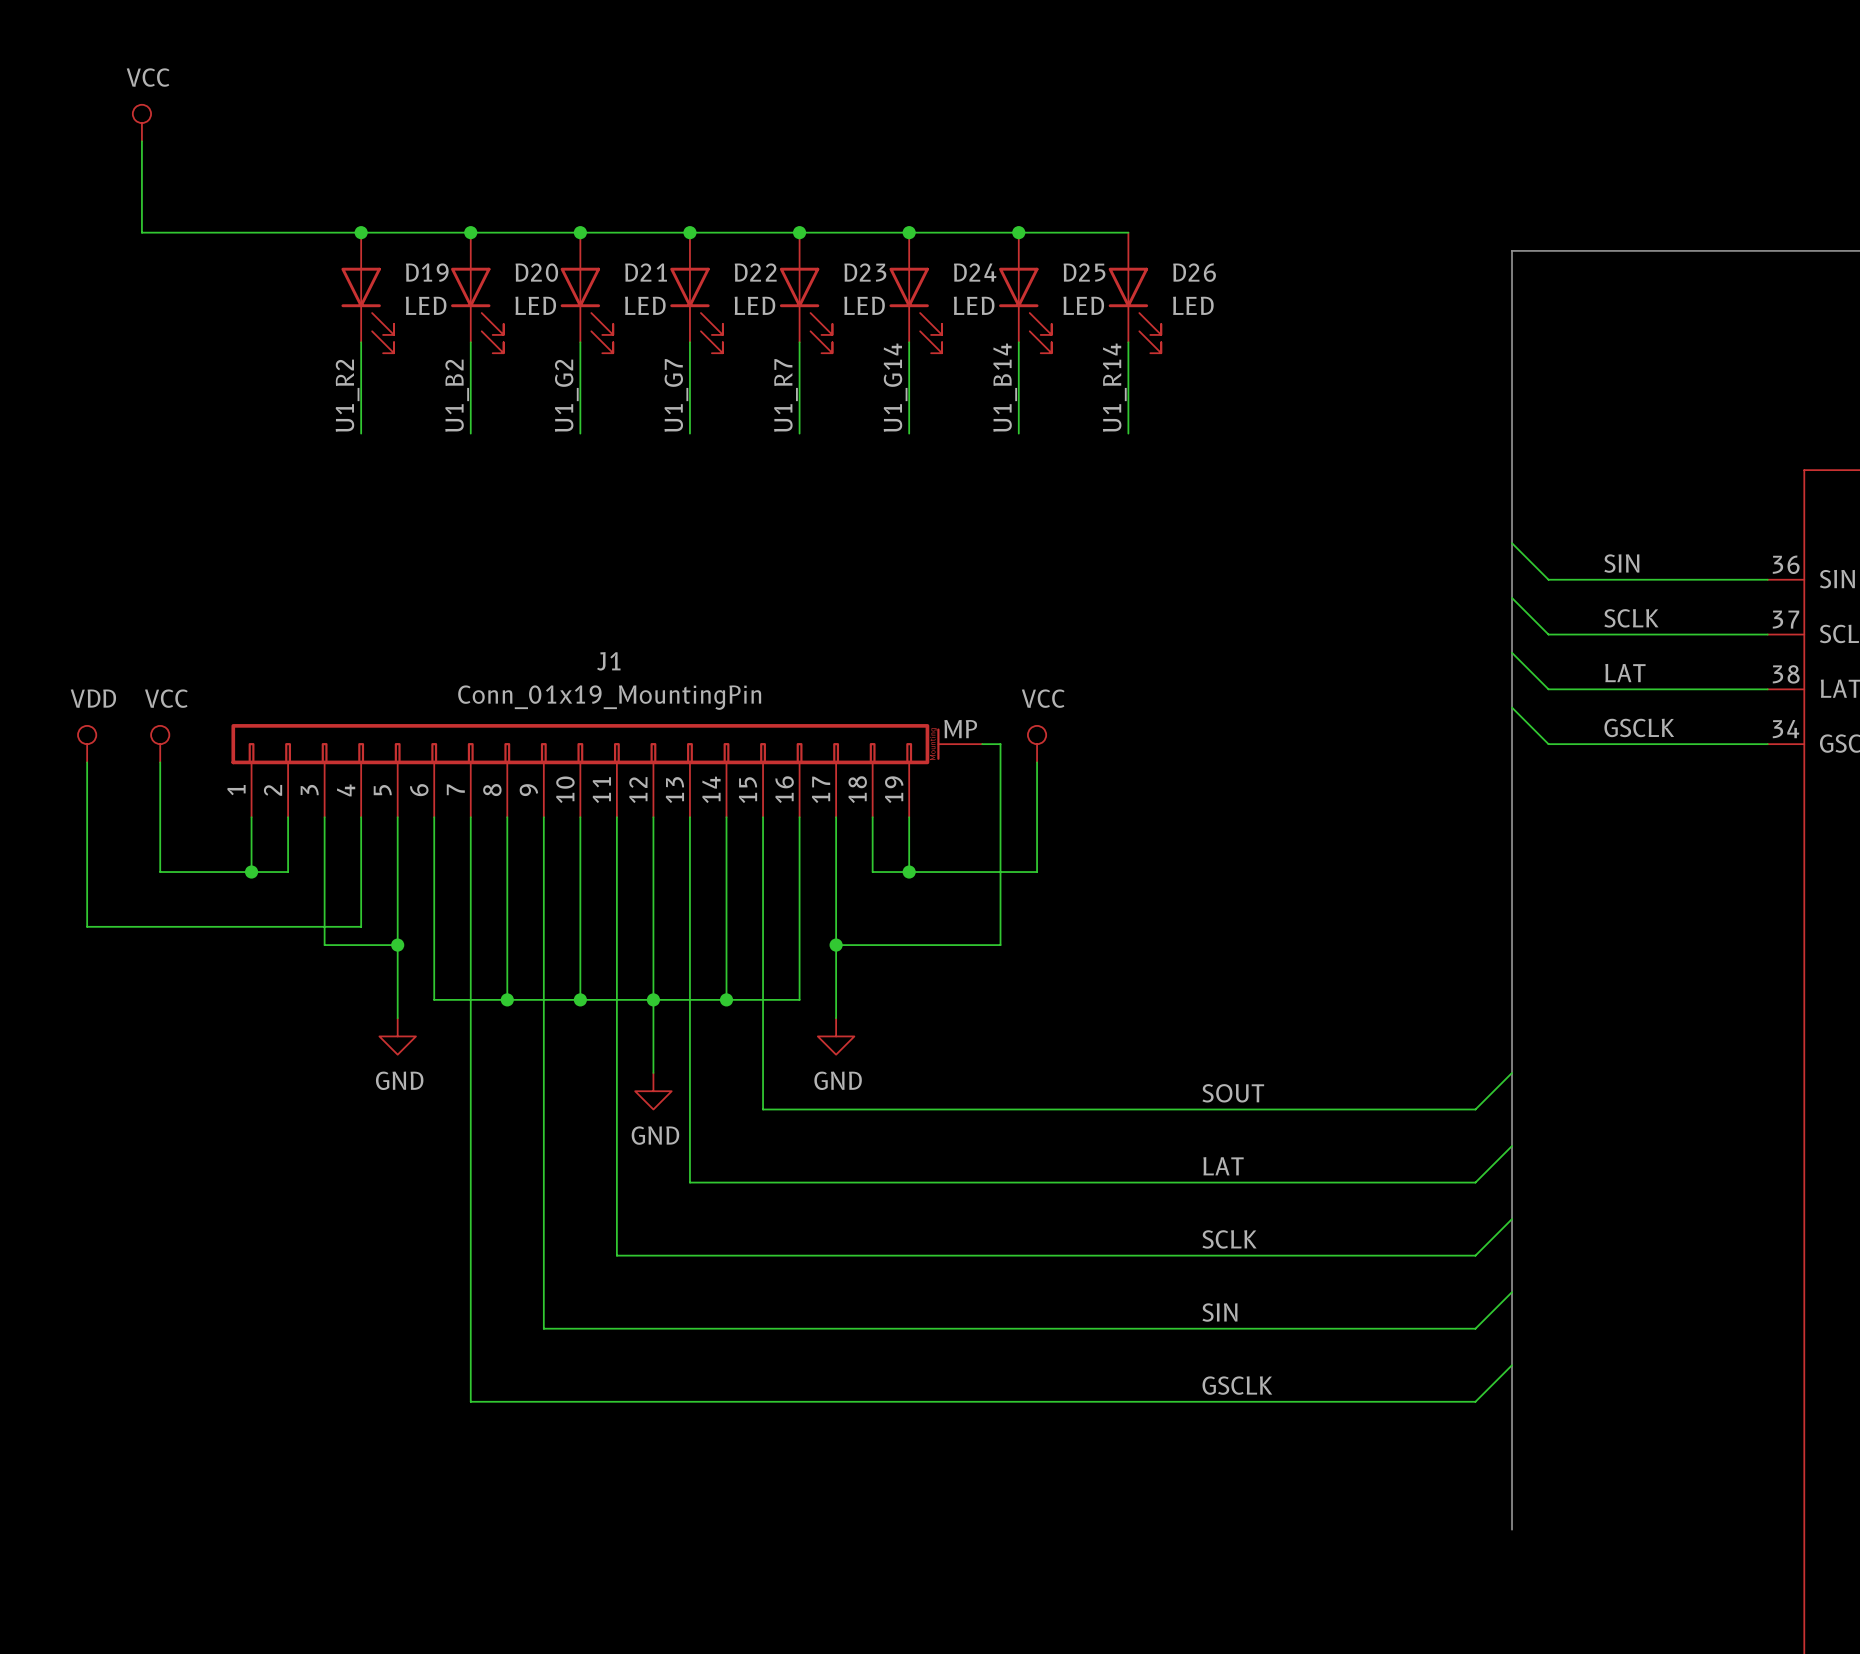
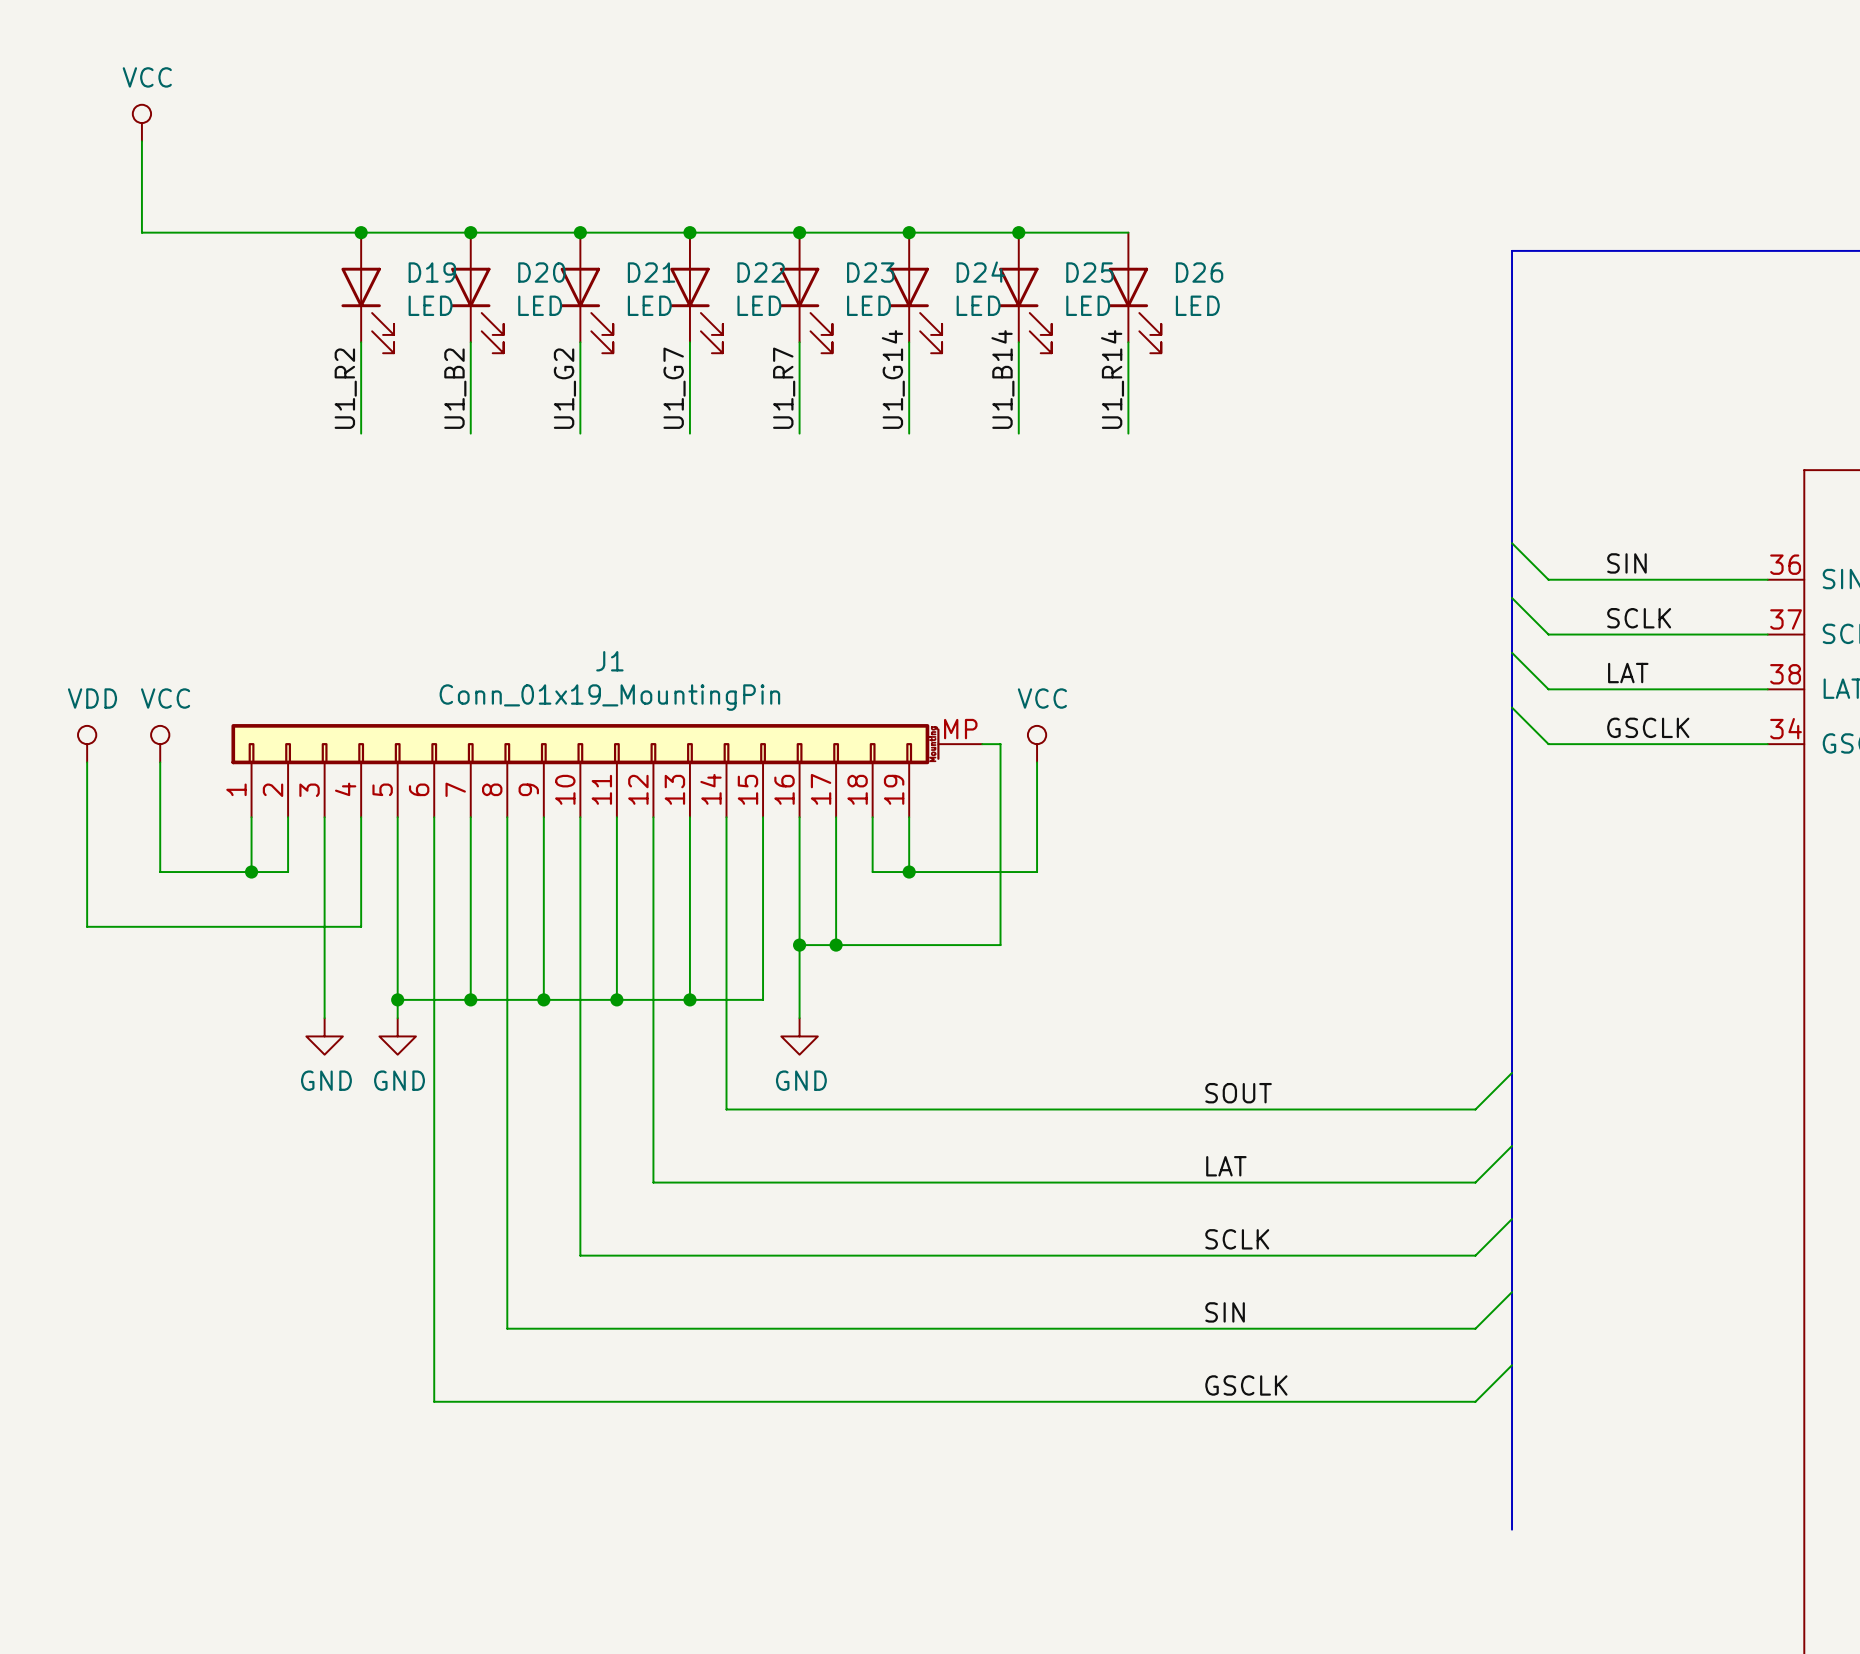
wire: (324, 945) (397, 945) -> (324, 945) (324, 1018)
junction: (397, 945) -> none
junction: none -> (799, 945)
wire: (836, 945) (836, 1018) -> (836, 945) (799, 945)
junction: none -> (397, 999)
wire: (470, 999) (470, 1401) -> (397, 999) (434, 999) (434, 1401) (470, 1401)
junction: none -> (470, 999)
junction: (507, 999) -> none
wire: (543, 999) (543, 1328) -> (507, 999) (507, 1328) (543, 1328)
junction: none -> (543, 999)
junction: (580, 999) -> none
wire: (616, 999) (616, 1255) -> (580, 999) (580, 1255) (616, 1255)
junction: none -> (616, 999)
junction: (653, 999) -> none
wire: (689, 999) (689, 1182) -> (653, 1072) (653, 1182) (689, 1182)
junction: none -> (689, 999)
junction: (726, 999) -> none
wire: (799, 999) (763, 999) (763, 1109) -> (726, 999) (726, 1109) (763, 1109)
wire: none -> (799, 999) (799, 1018)
power symbol: none -> GND (324, 1036)
power symbol position: GND (836, 1036) -> GND (799, 1036)
power symbol: GND (653, 1091) -> none

